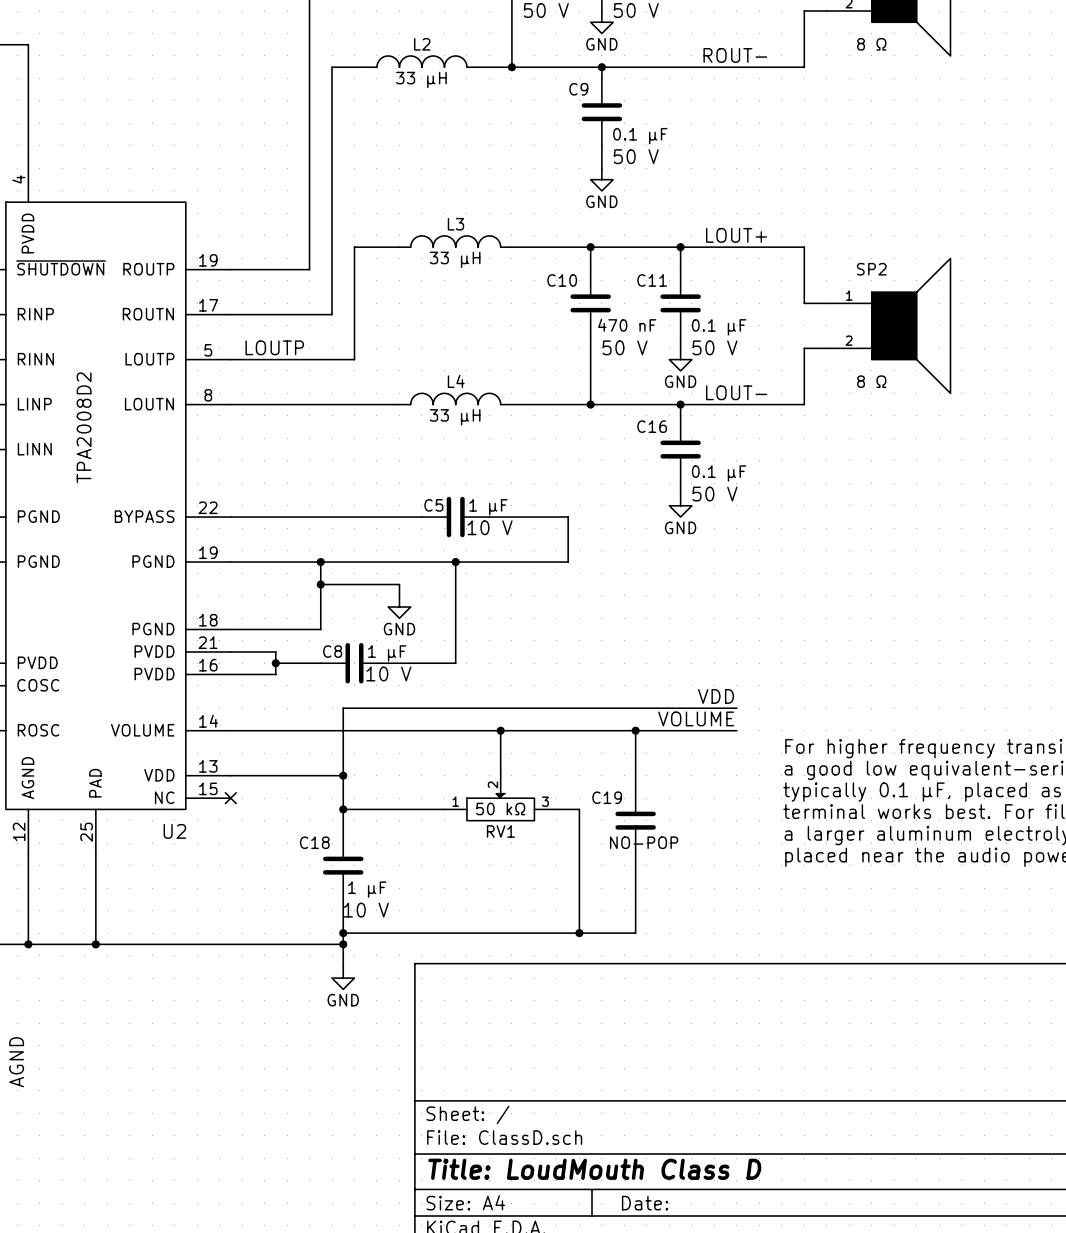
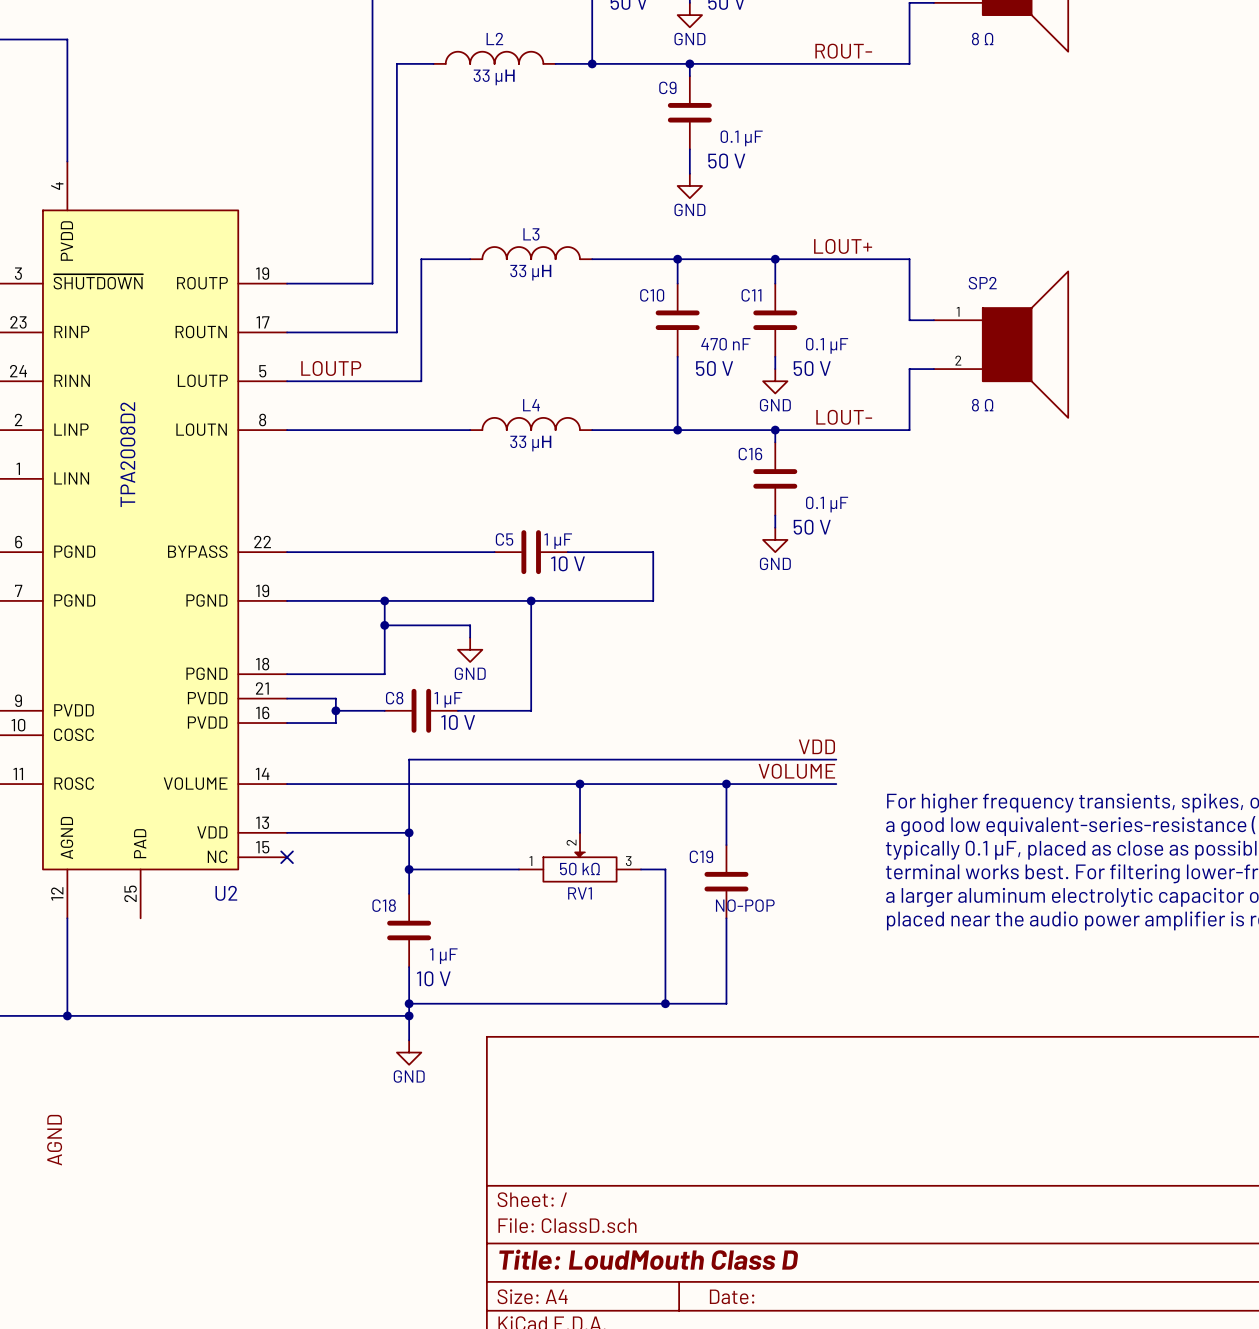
wire: (95, 854) (95, 944) -> none
junction: (95, 944) -> none

